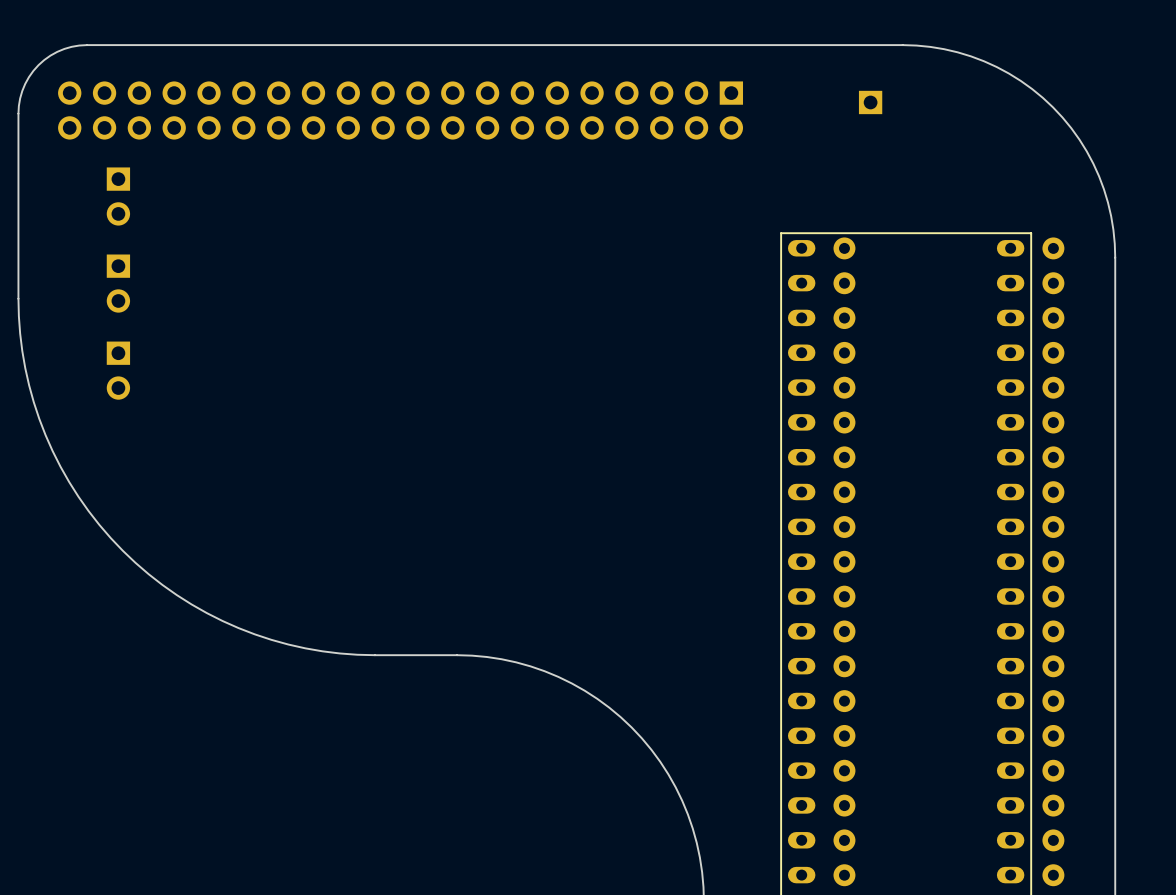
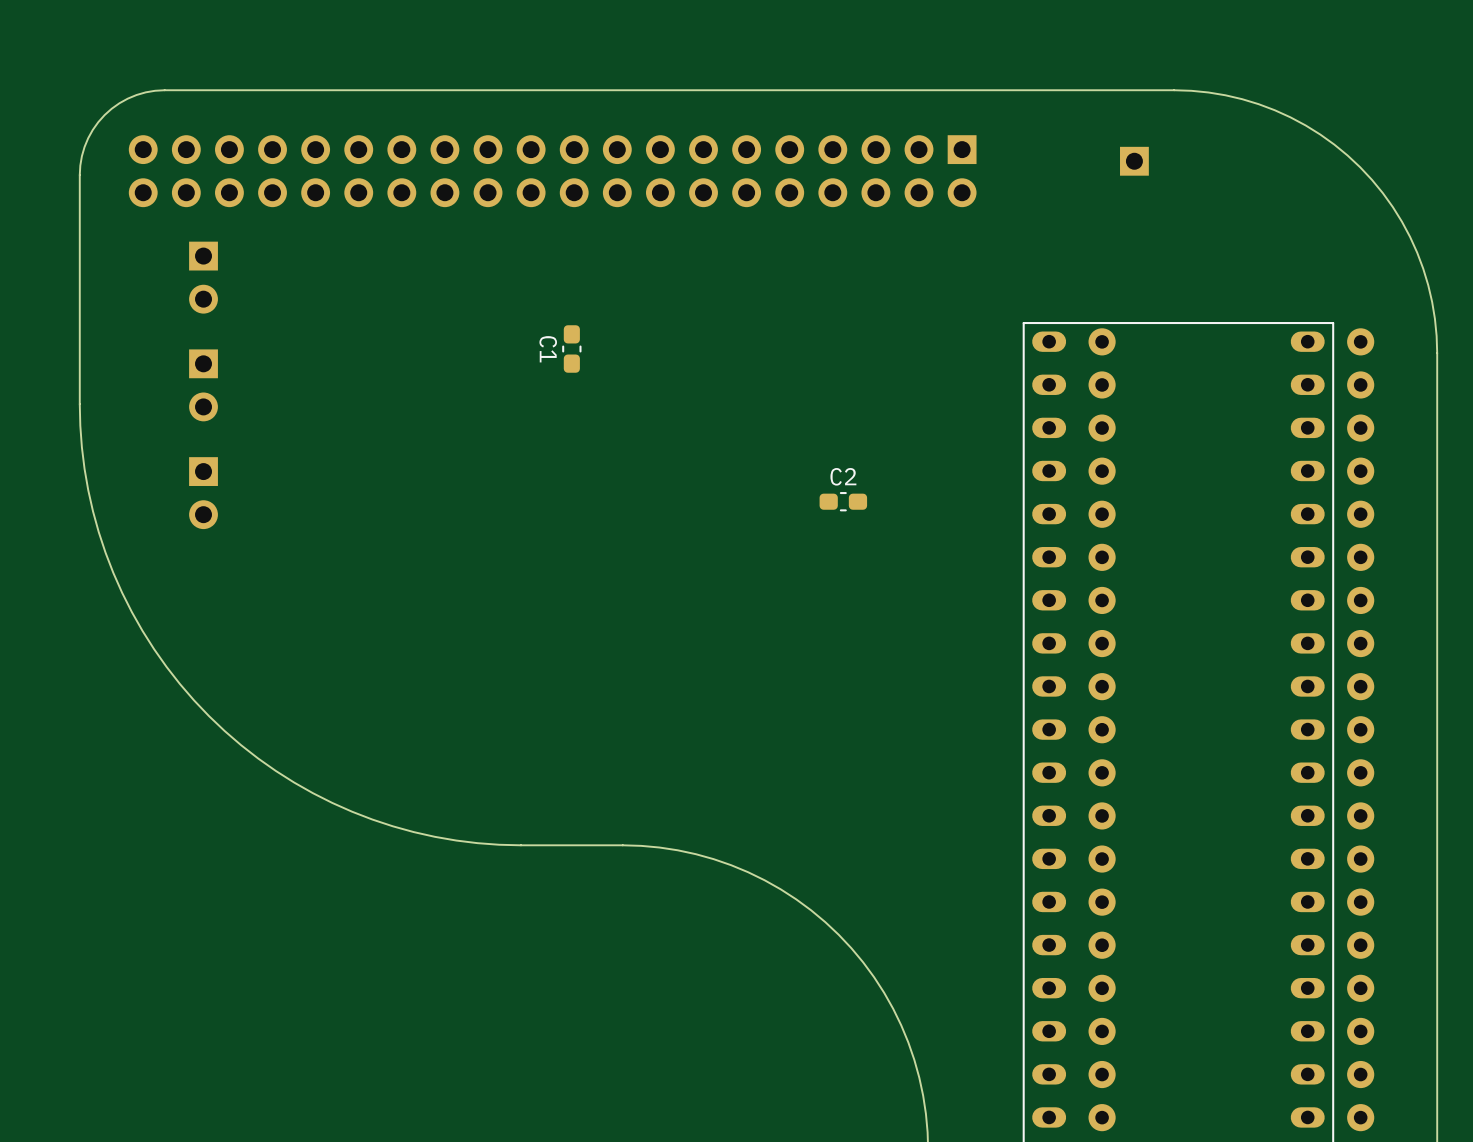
C1: none -> (571, 348)
C2: none -> (843, 501)

